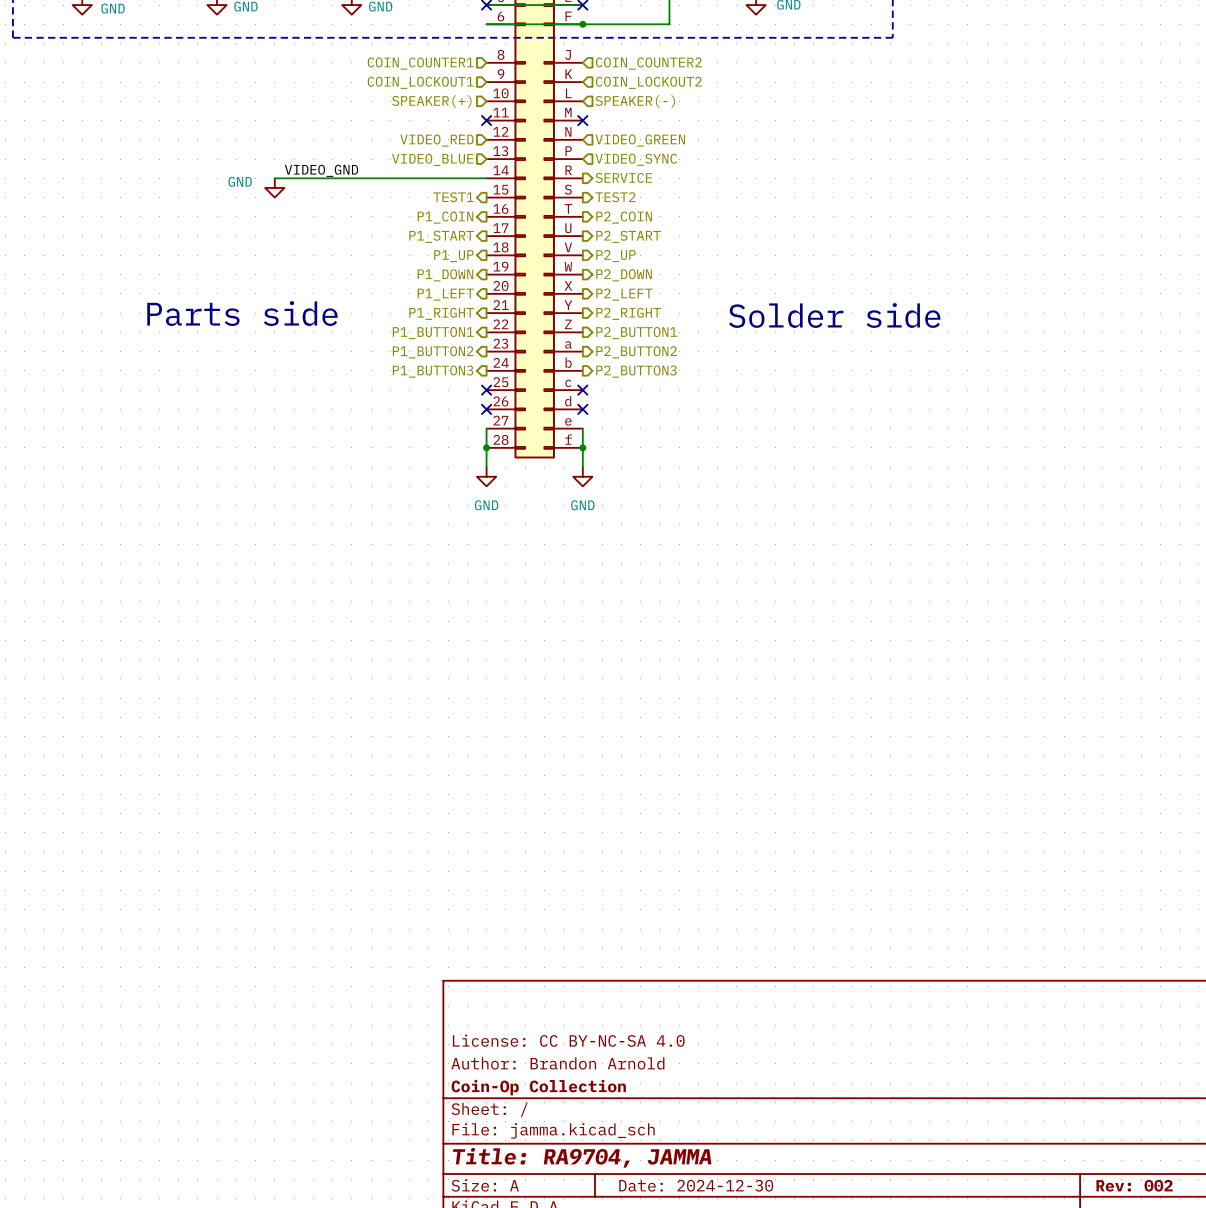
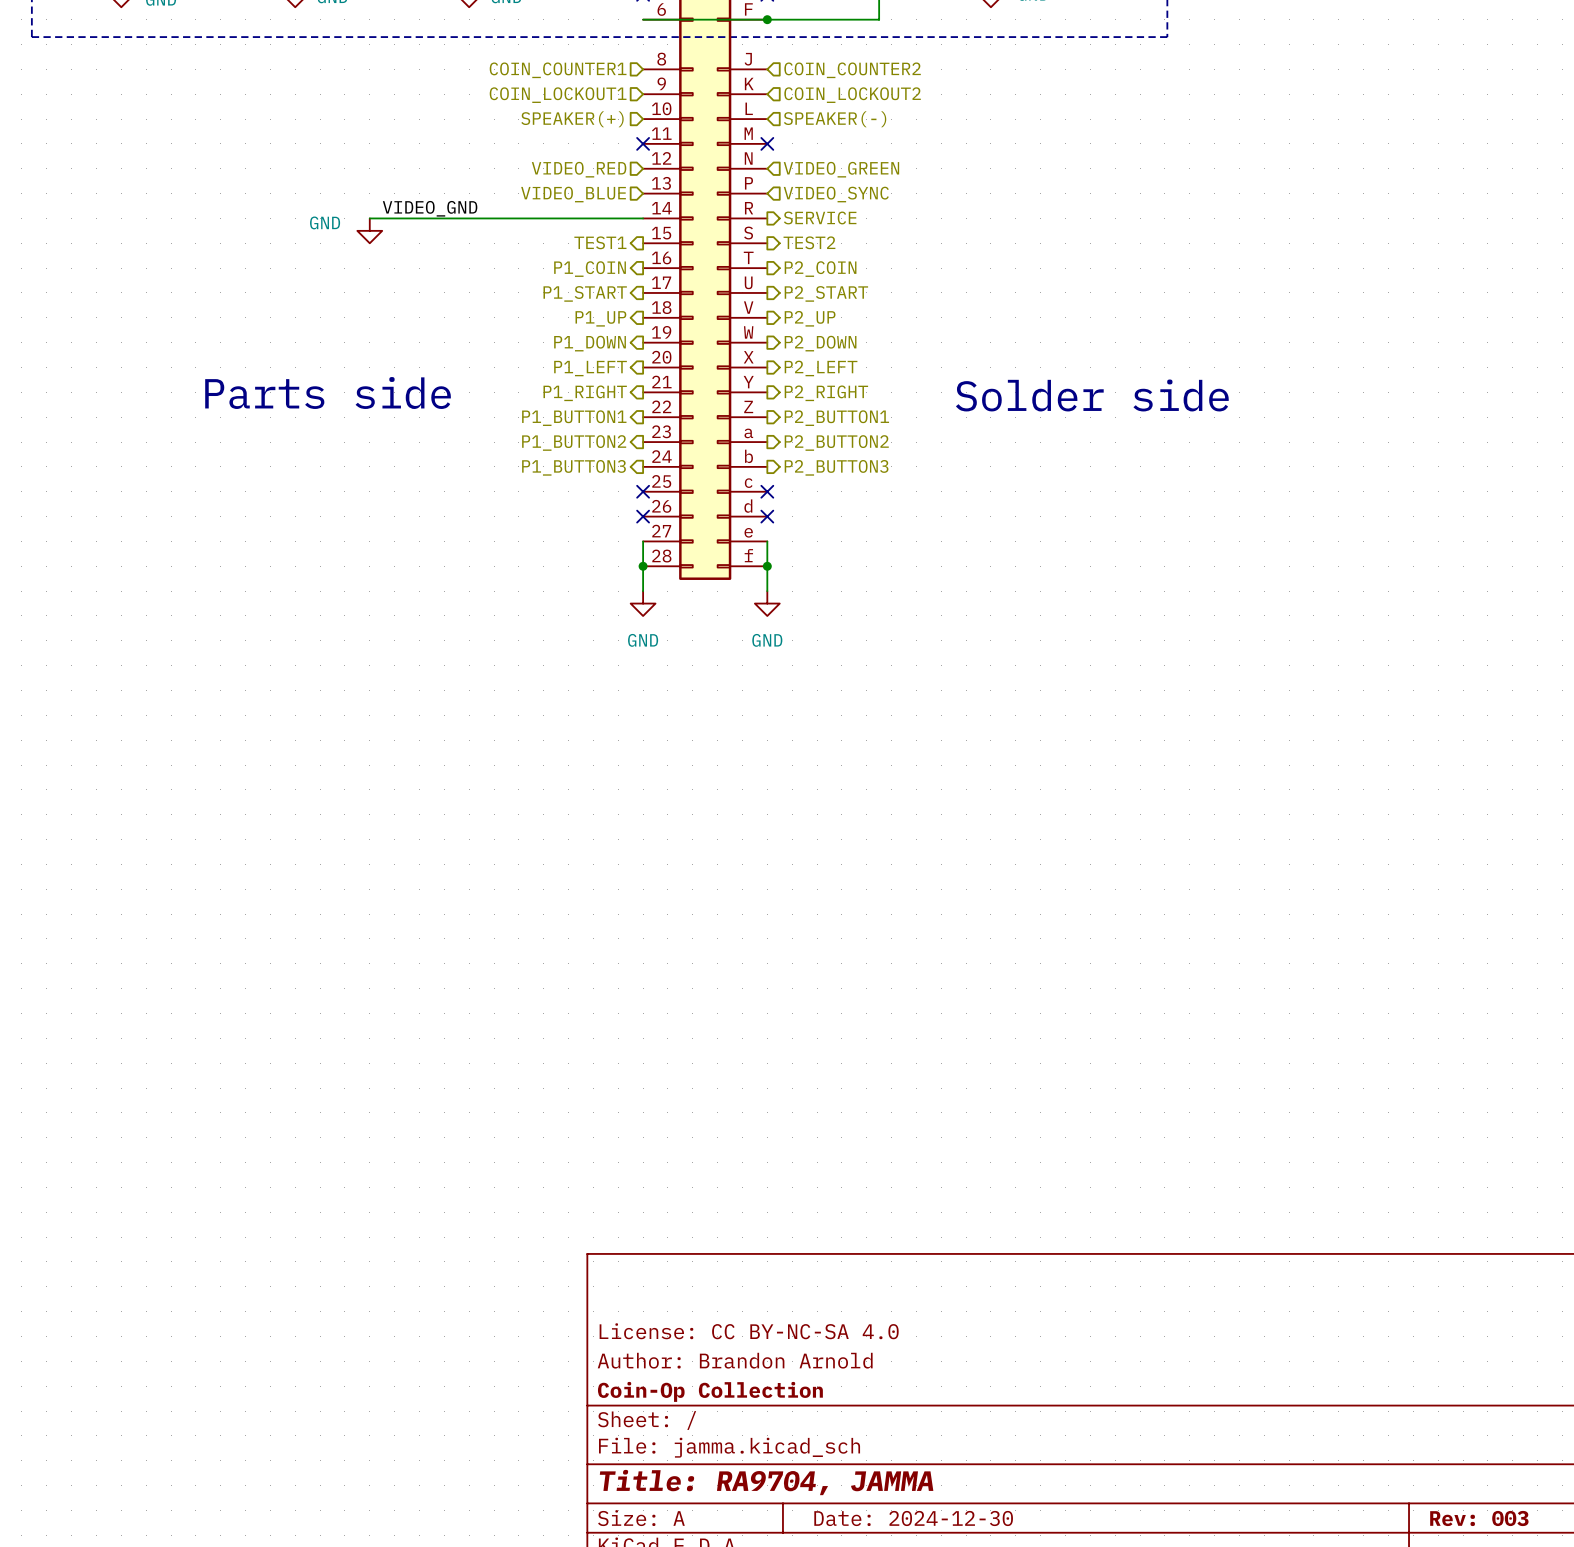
title block: Rev: 002 (1134, 1185) -> Rev: 003 (1479, 1518)

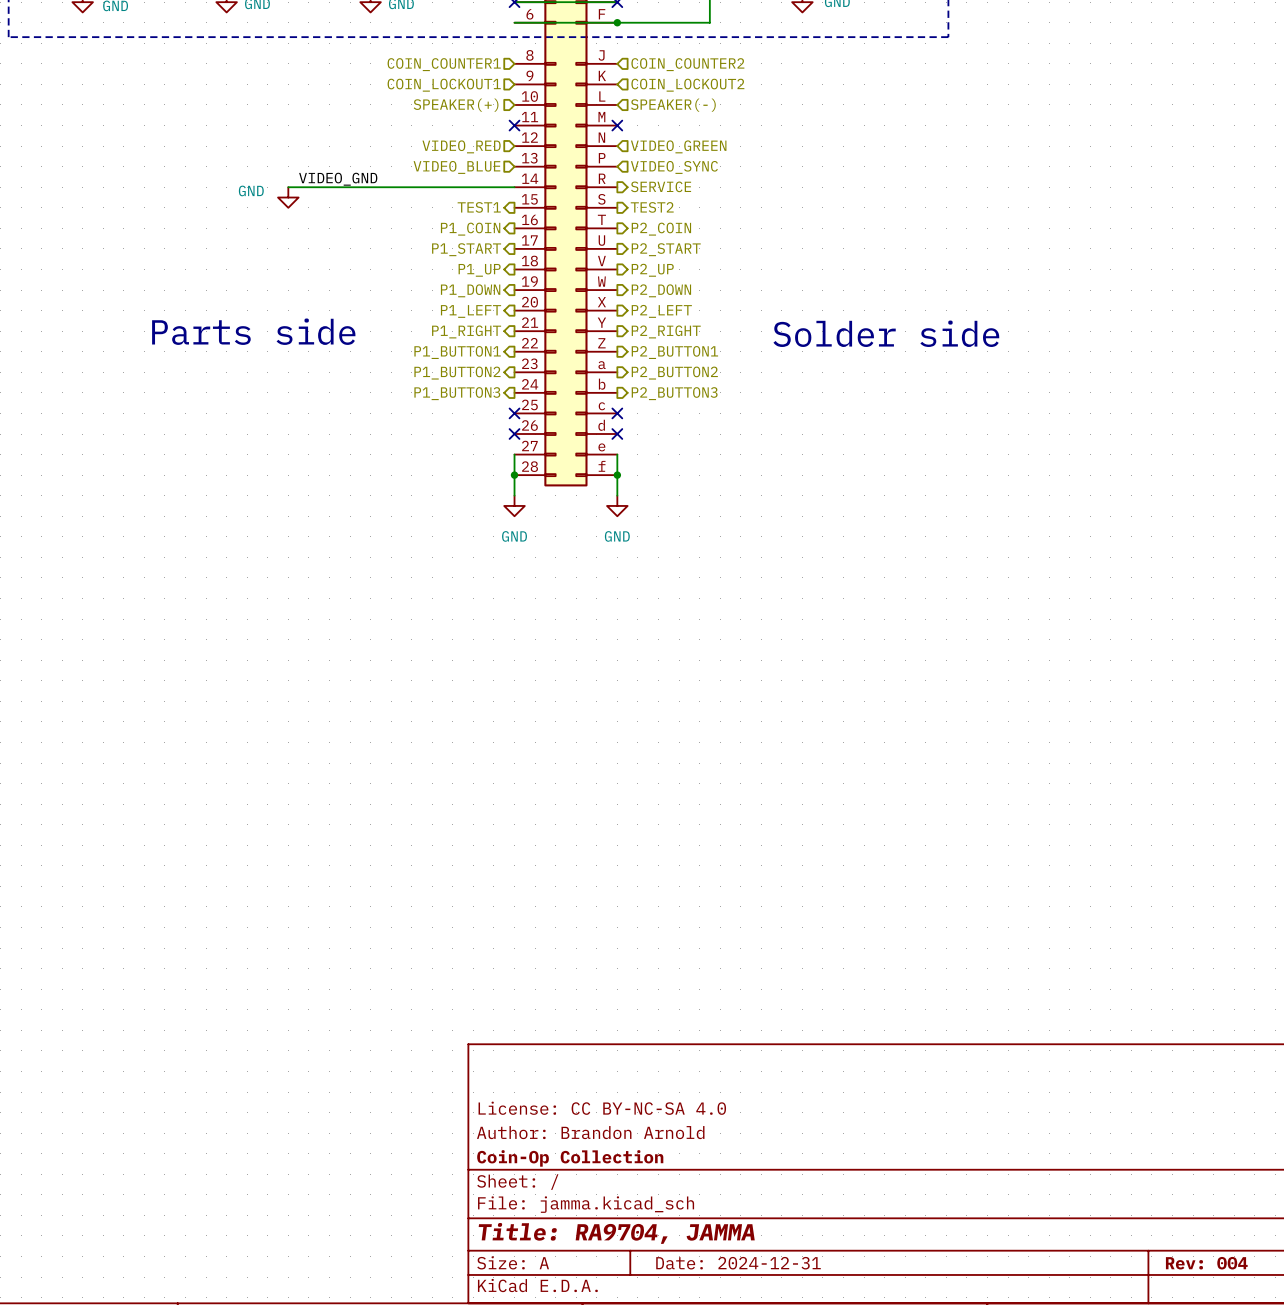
title block: Date: 2024-12-30 (913, 1518) -> Date: 2024-12-31 (738, 1263)
title block: Rev: 003 (1479, 1518) -> Rev: 004 (1206, 1263)

